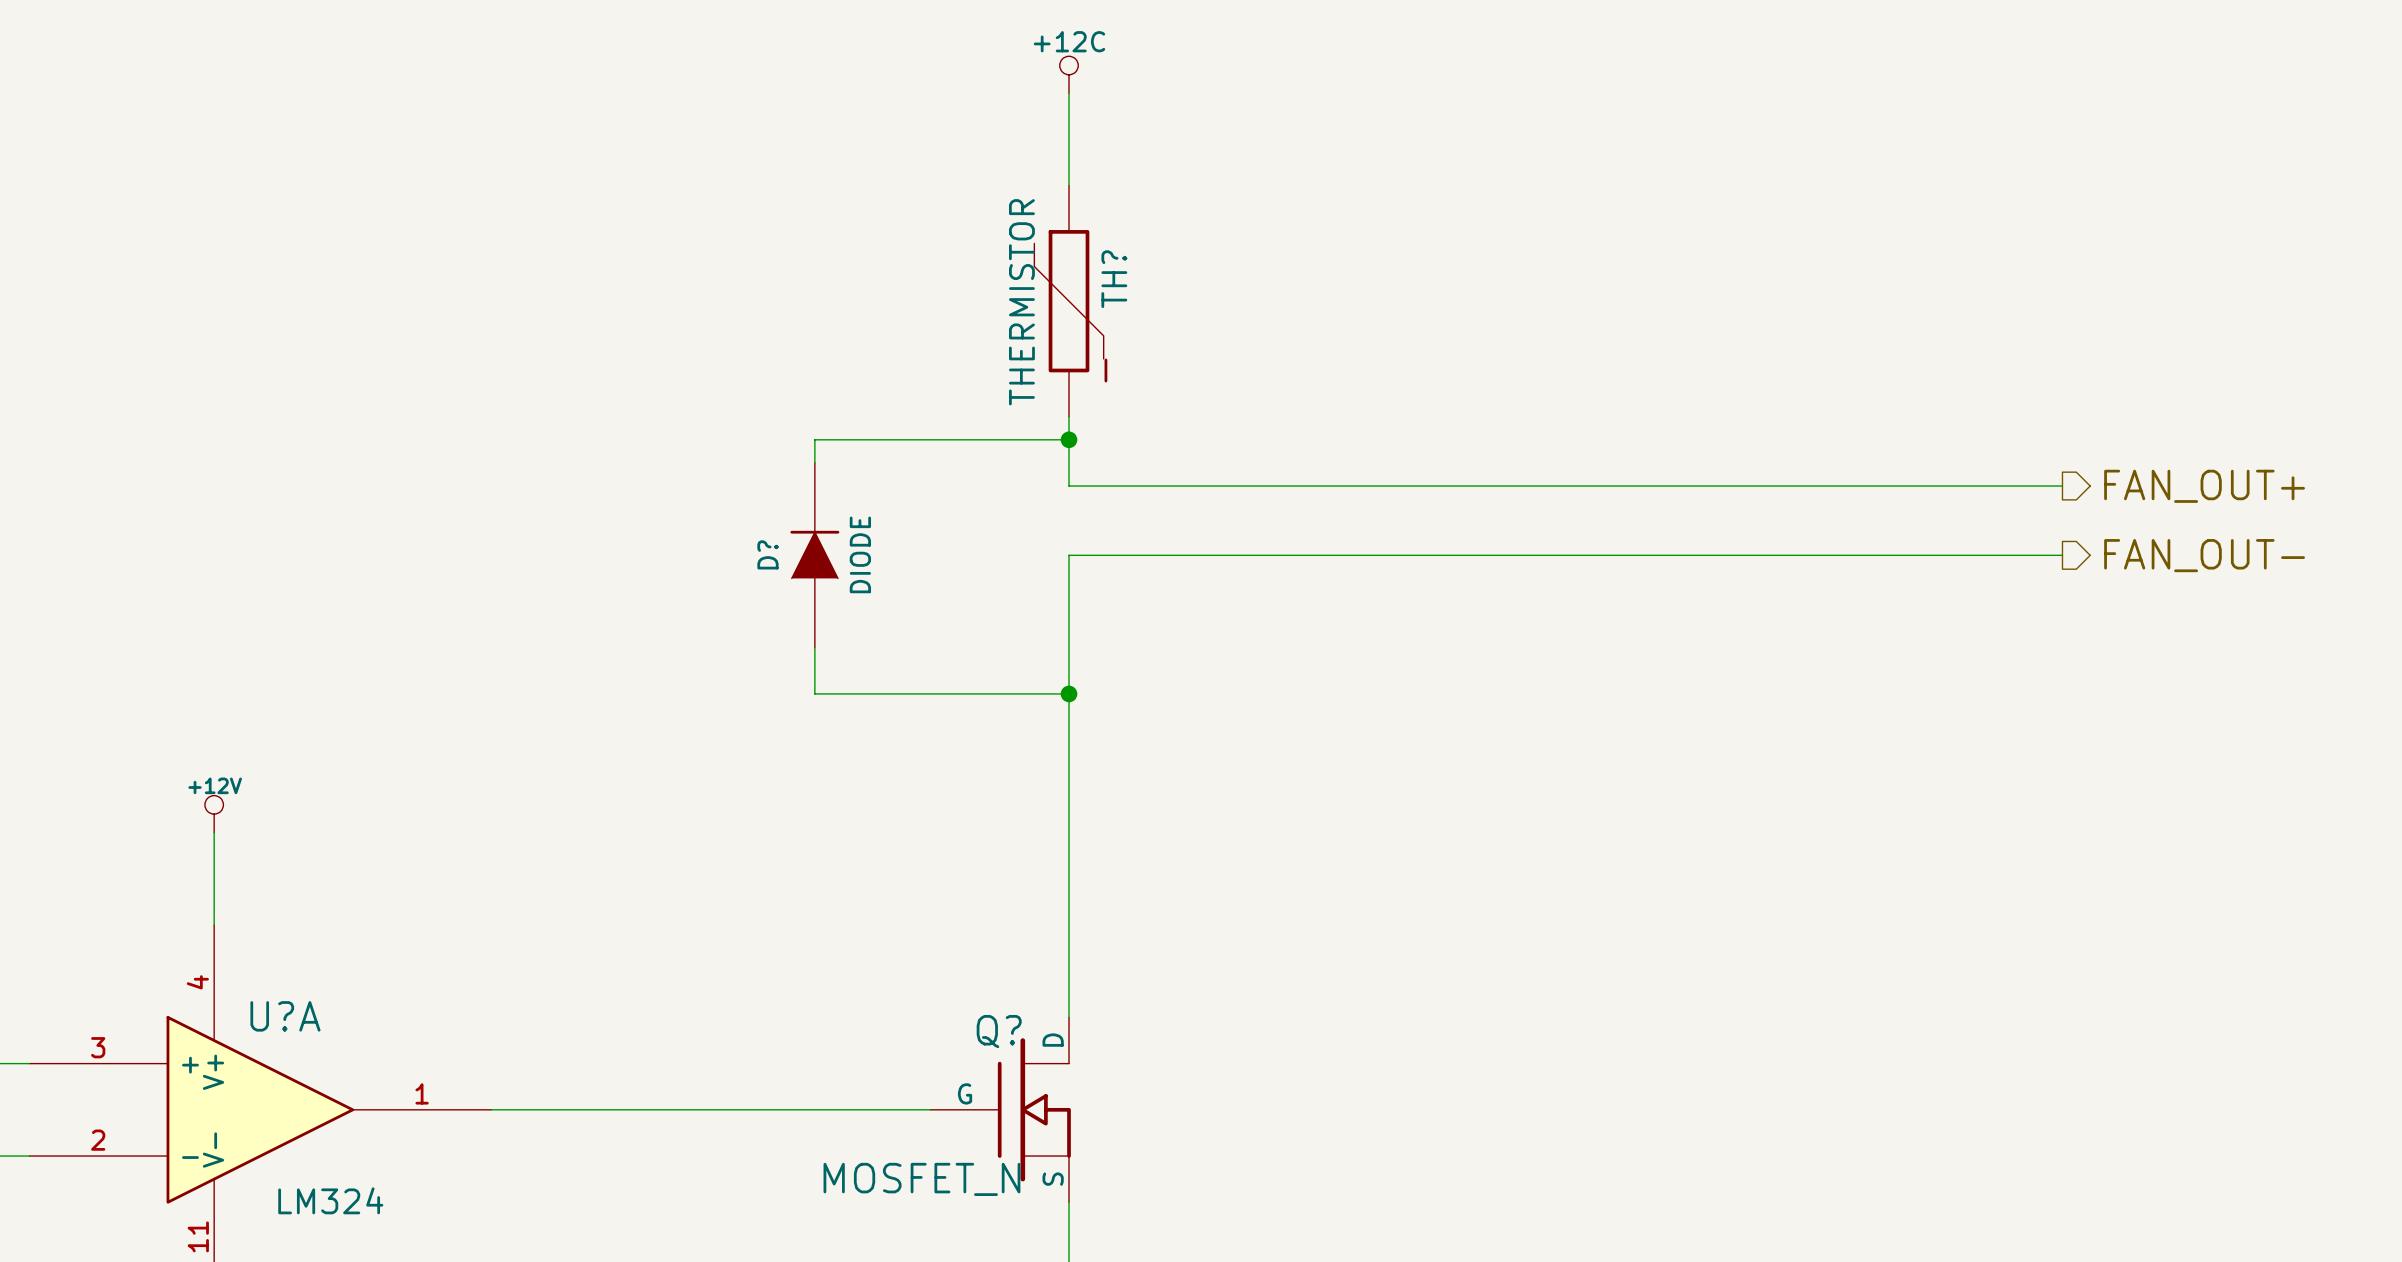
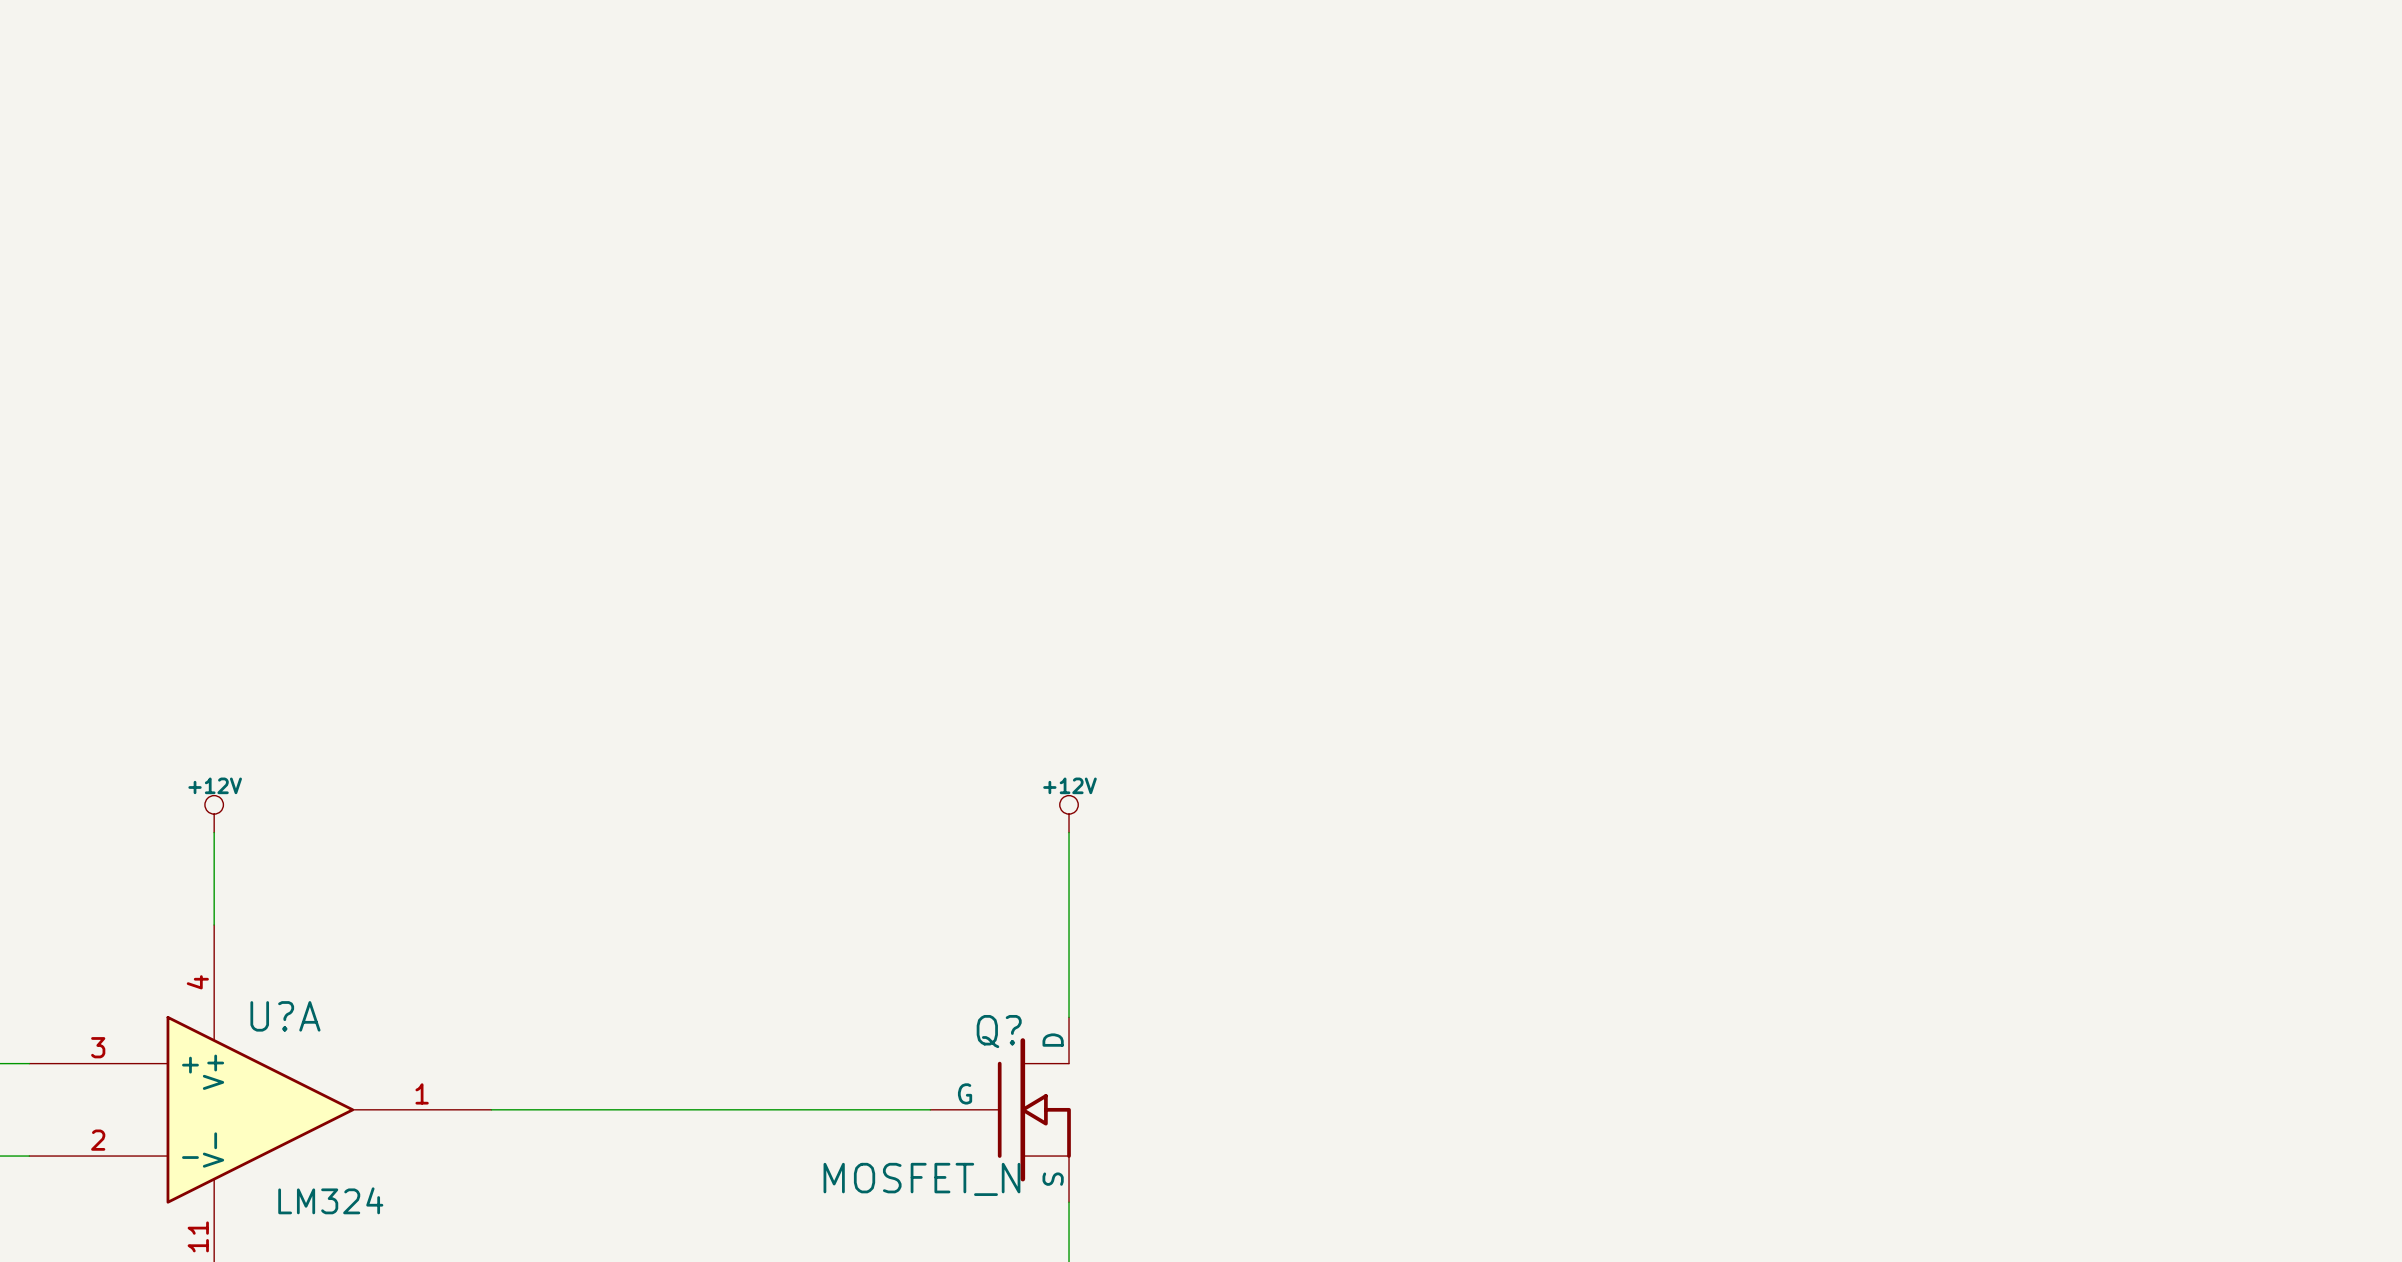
power symbol: +12C (1069, 74) -> none
wire: (1069, 93) (1069, 185) -> none
TH?: THERMISTOR (1069, 301) -> none
wire: (1069, 416) (1069, 486) (2062, 486) -> none
wire: (1069, 439) (814, 439) (814, 462) -> none
junction: (1069, 439) -> none
hierarchical label: FAN_OUT+ (2204, 486) -> none
D?: DIODE (814, 555) -> none
wire: (2062, 555) (1069, 555) (1069, 832) -> none
hierarchical label: FAN_OUT- (2204, 555) -> none
wire: (814, 647) (814, 693) (1069, 693) -> none
junction: (1069, 693) -> none
power symbol: none -> +12V (1069, 814)

